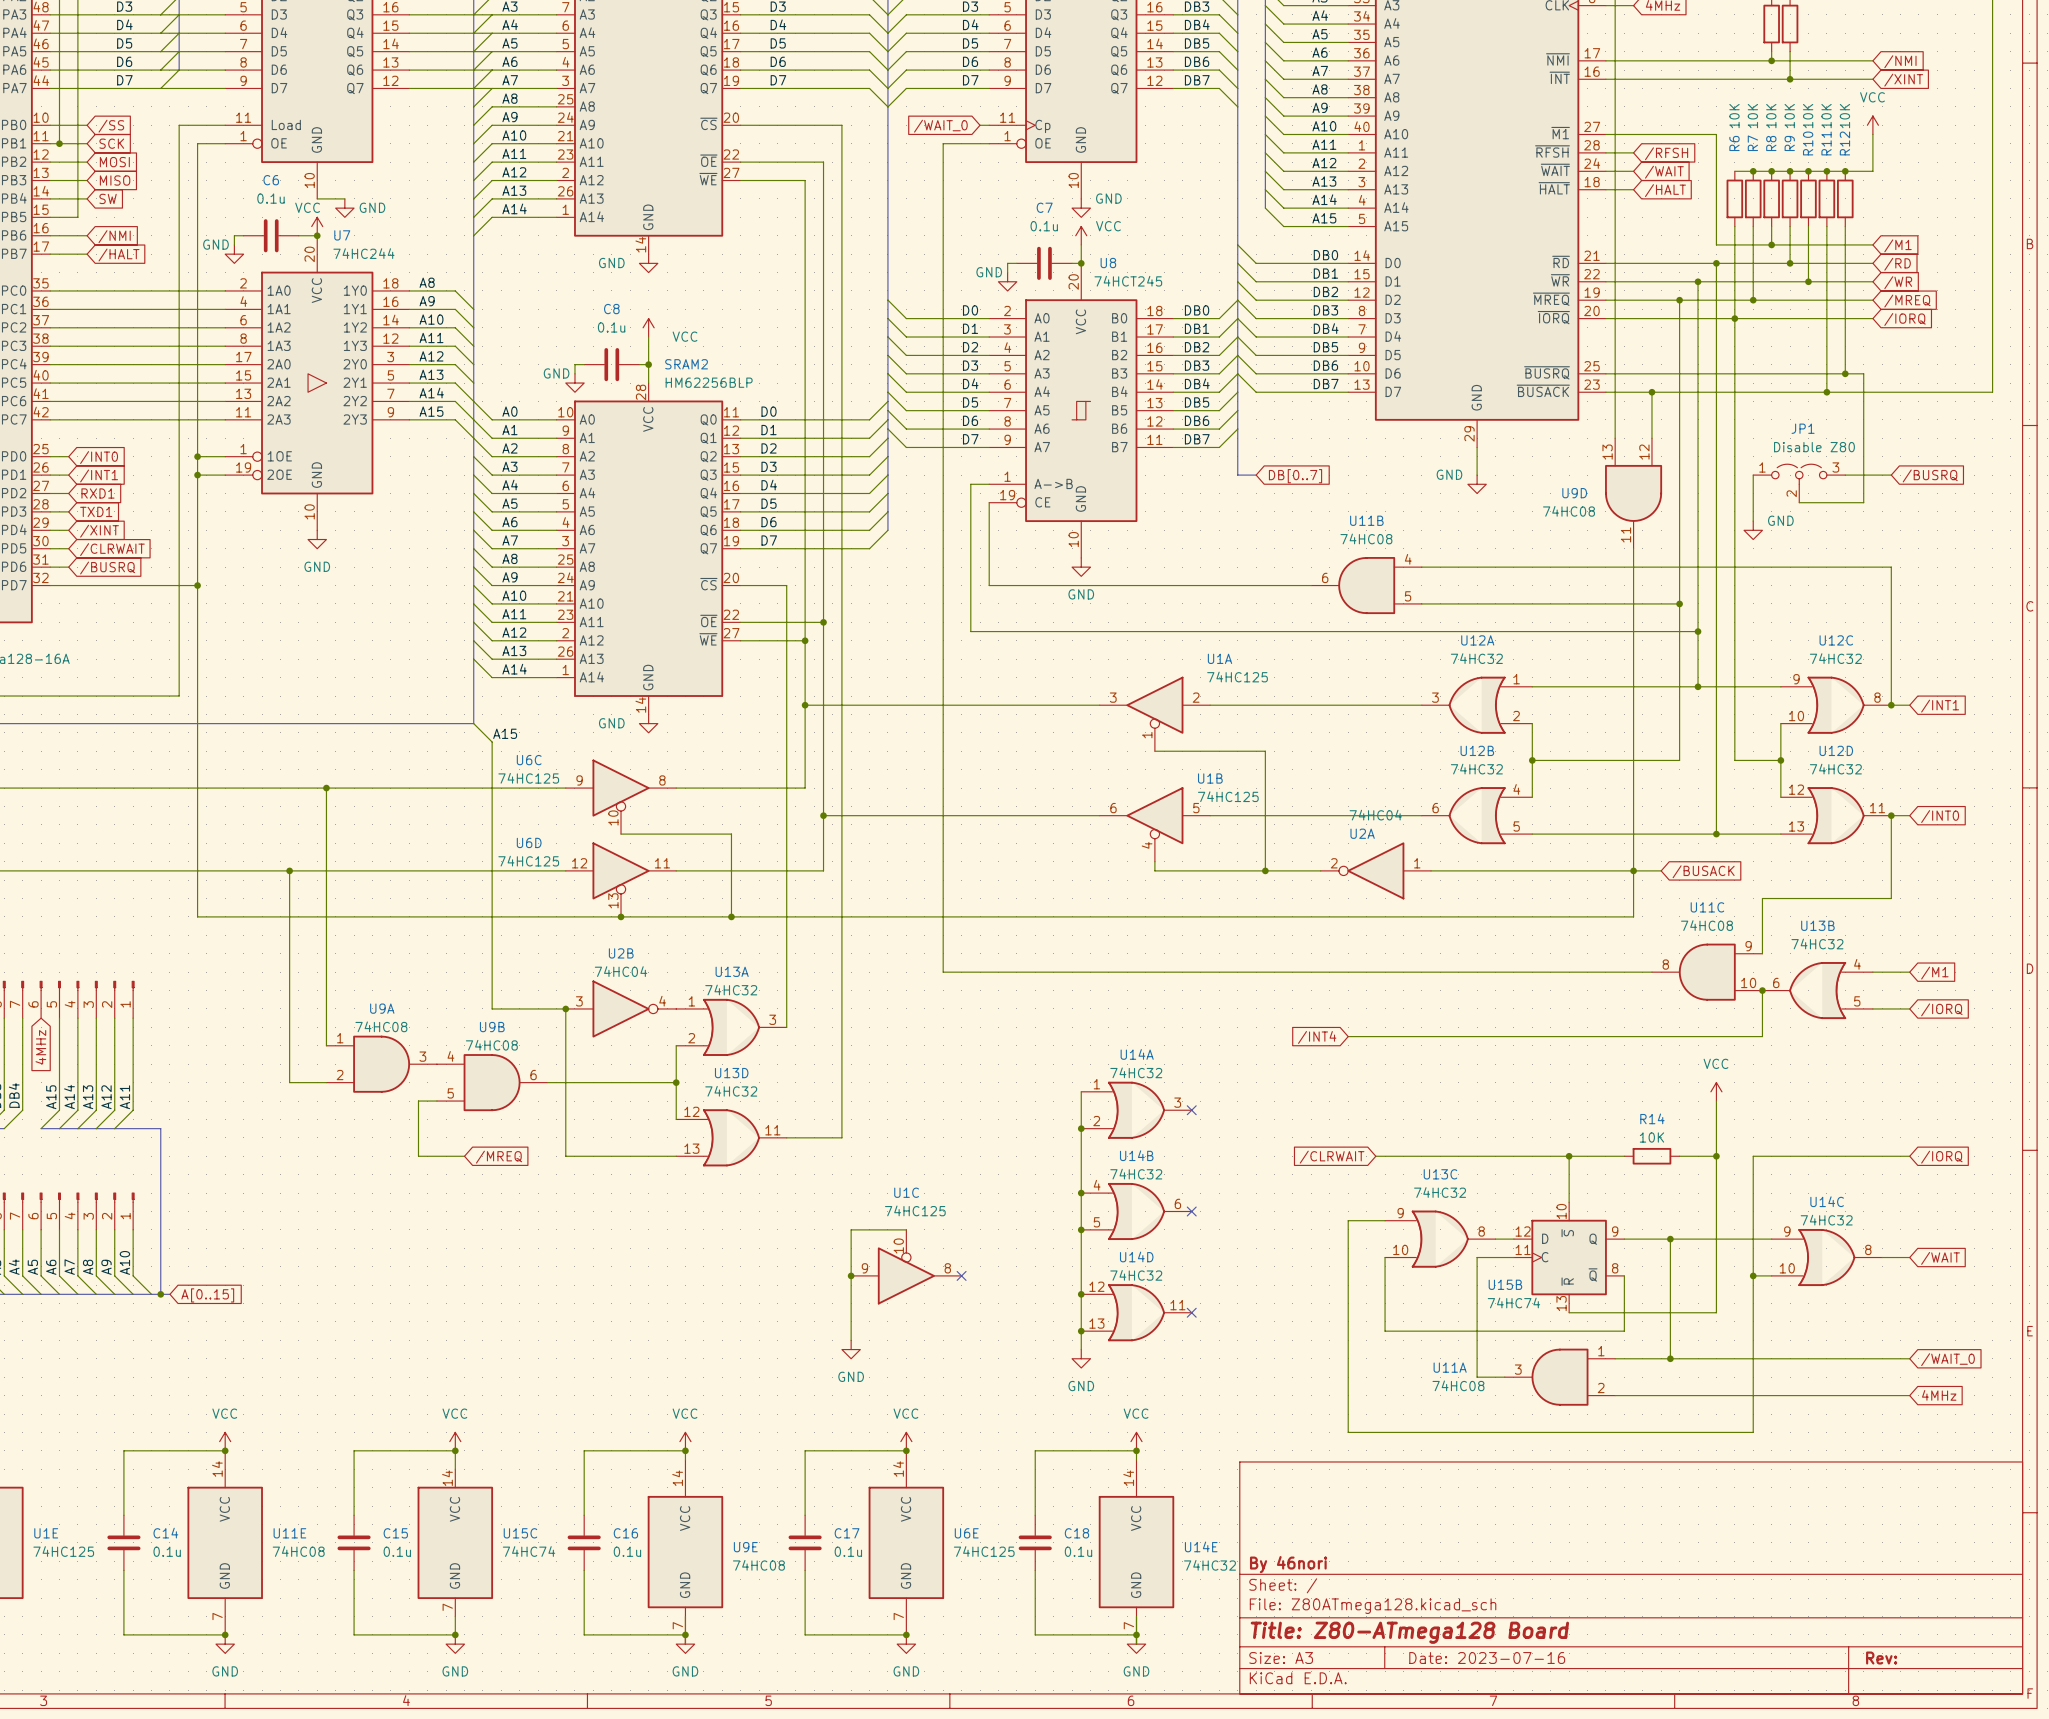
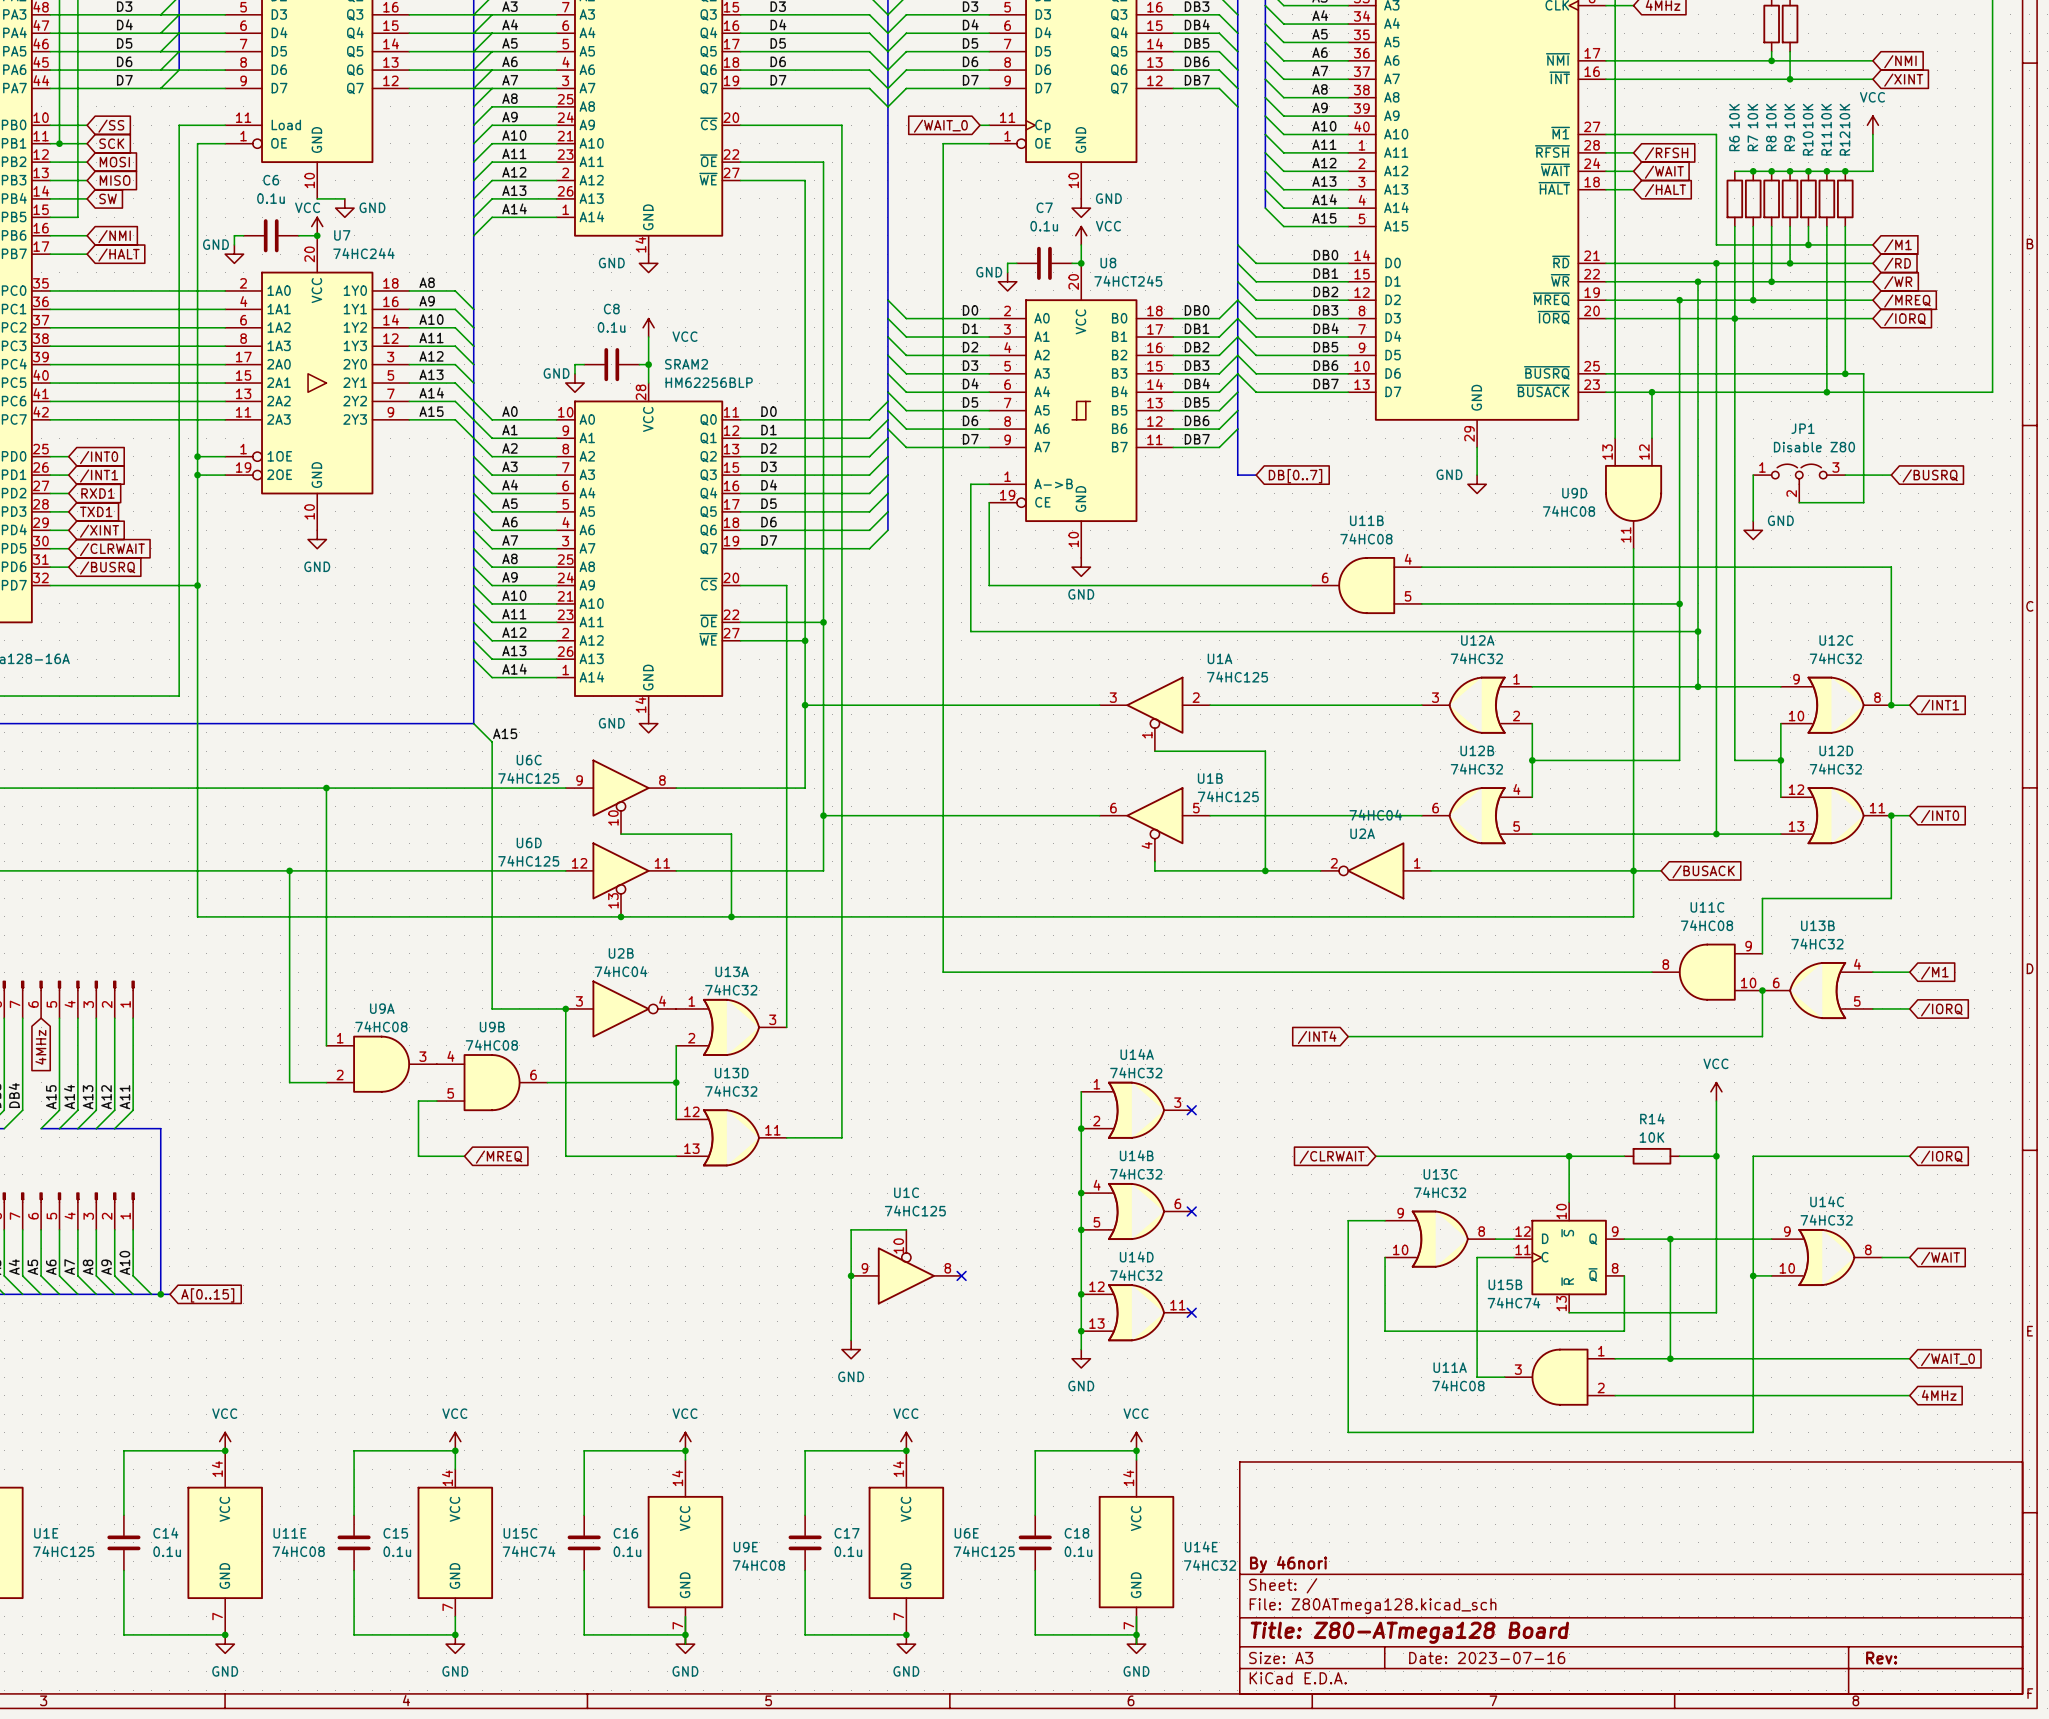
junction: (1771, 244) -> none
wire: (1808, 244) (1808, 281) -> (1771, 244) (1771, 281)
junction: none -> (1808, 244)
junction: none -> (1771, 281)
junction: (1808, 281) -> none

